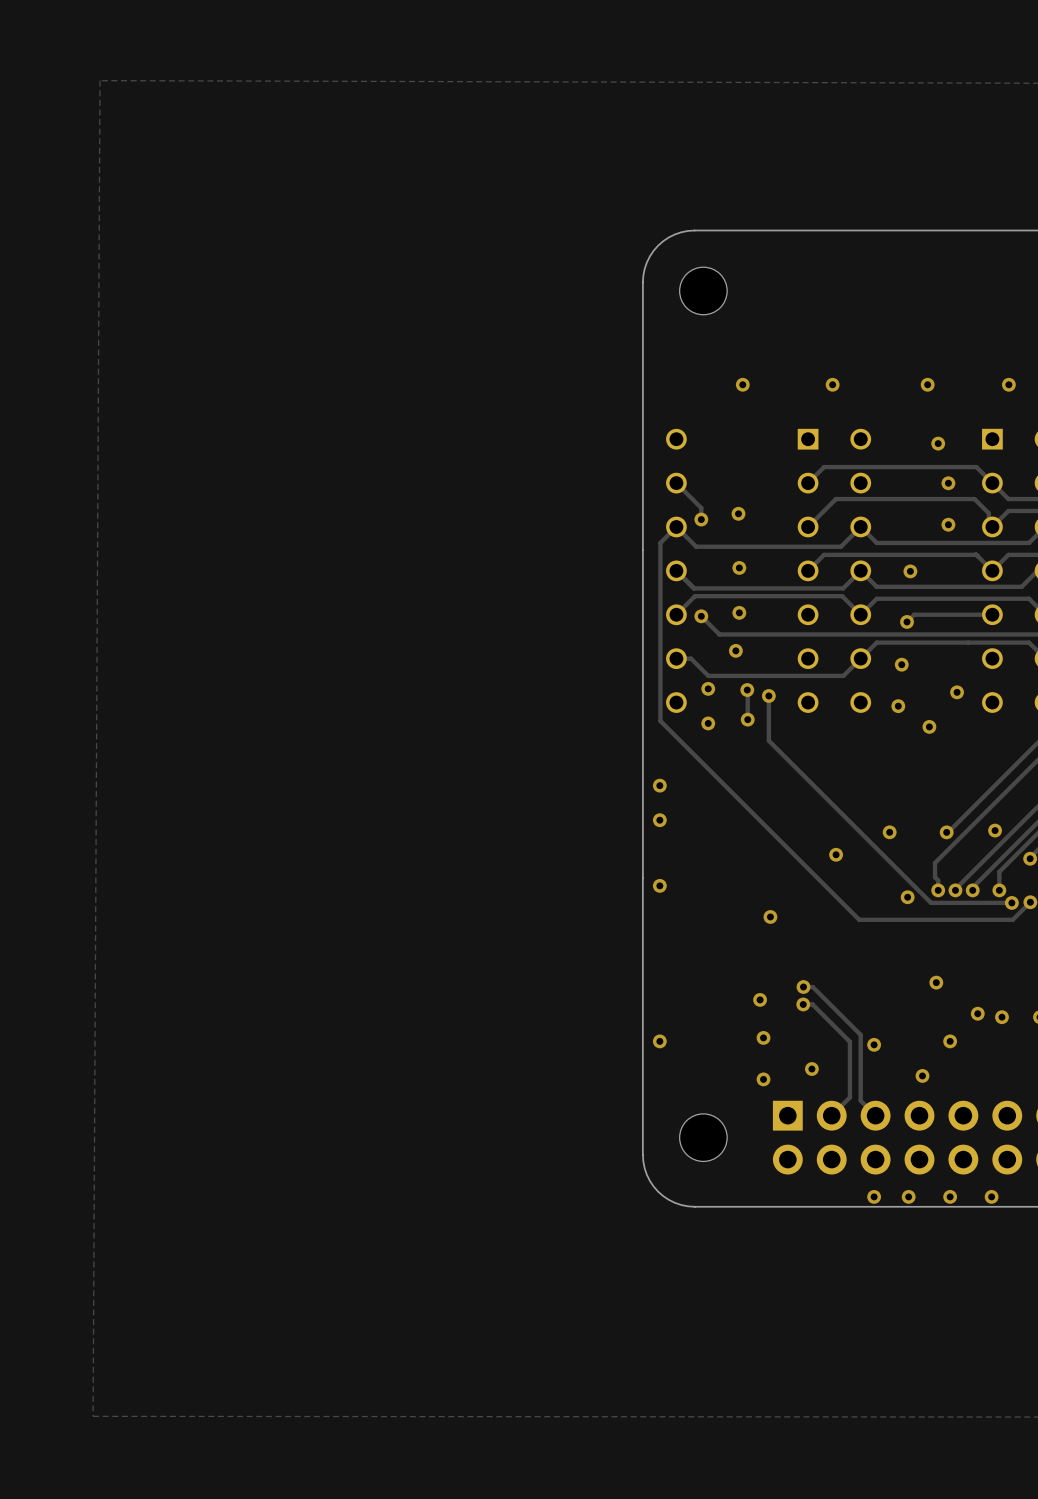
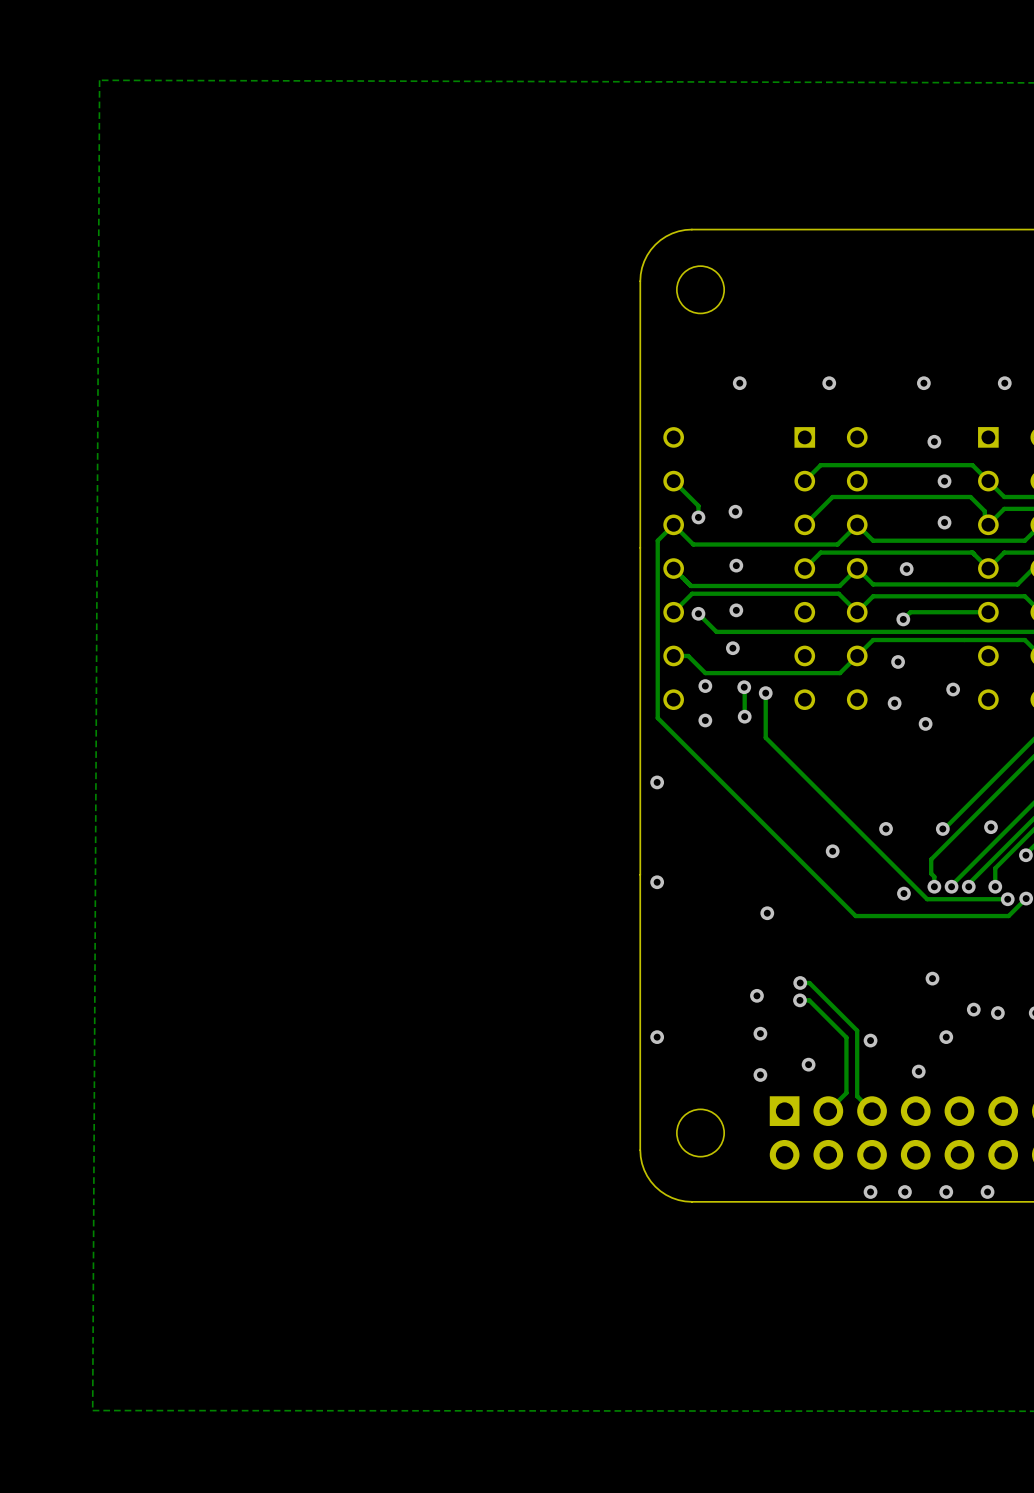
via: (659, 820) -> none

